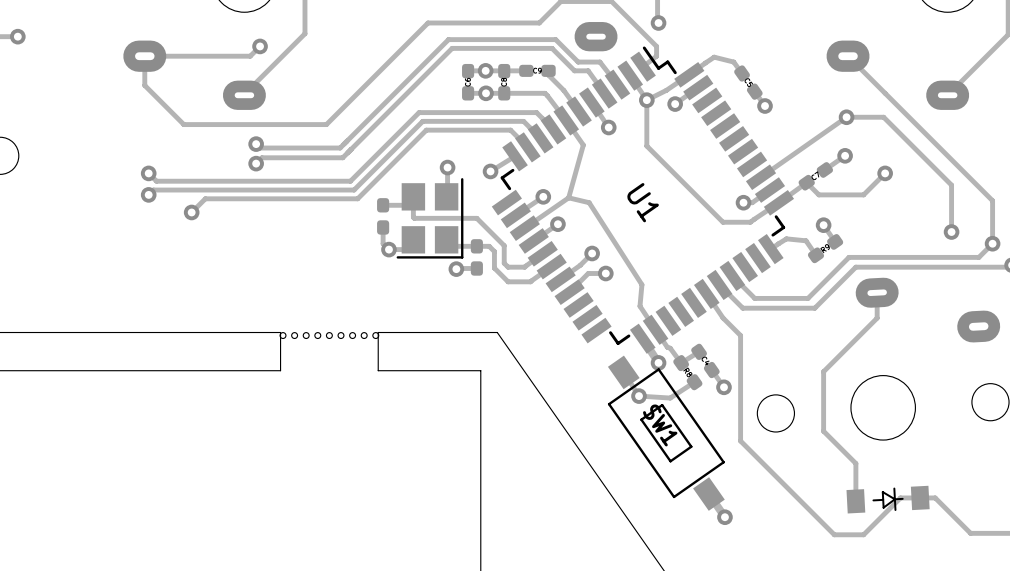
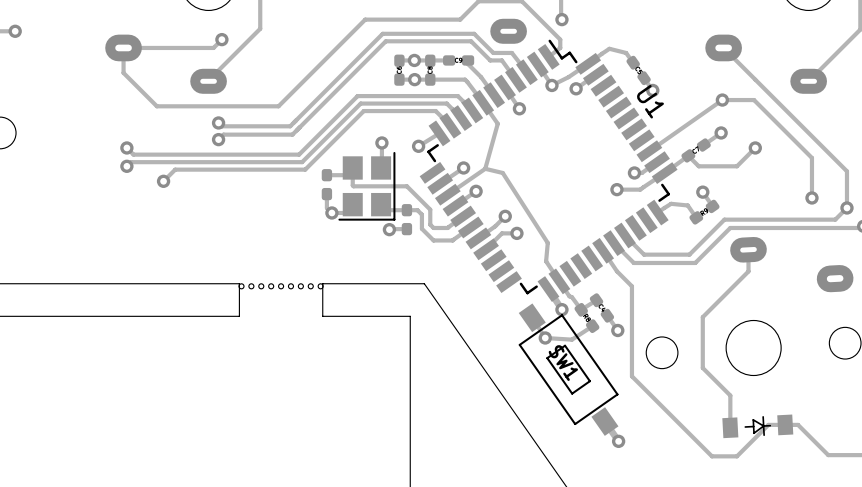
track: (646, 100) (646, 146) (723, 222) -> none
U1 name position: U1 (643, 202) -> U1 (650, 101)
via: none -> (616, 189)

